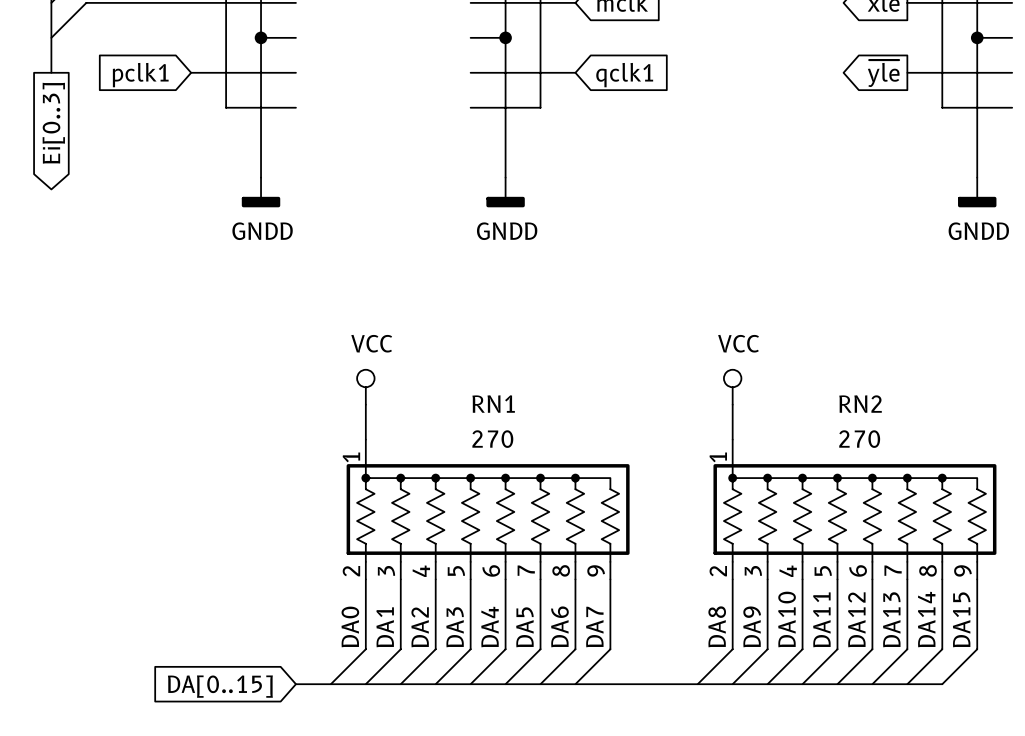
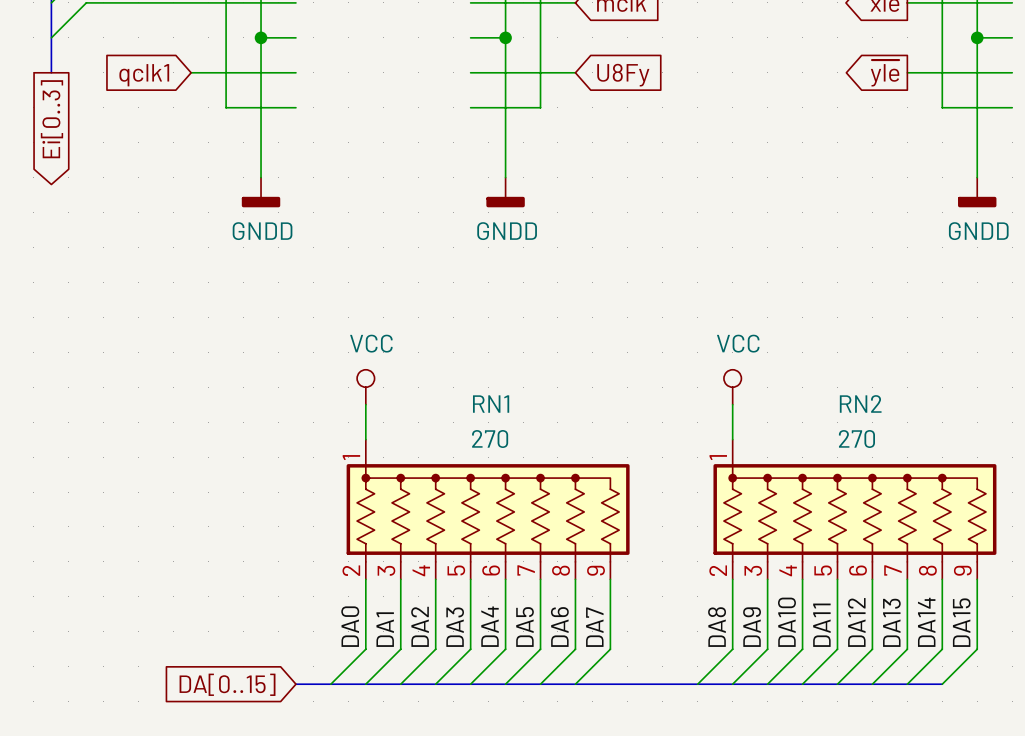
global label: pclk1 (140, 75) -> qclk1 (144, 75)
global label: qclk1 (624, 75) -> U8Fy (623, 75)

